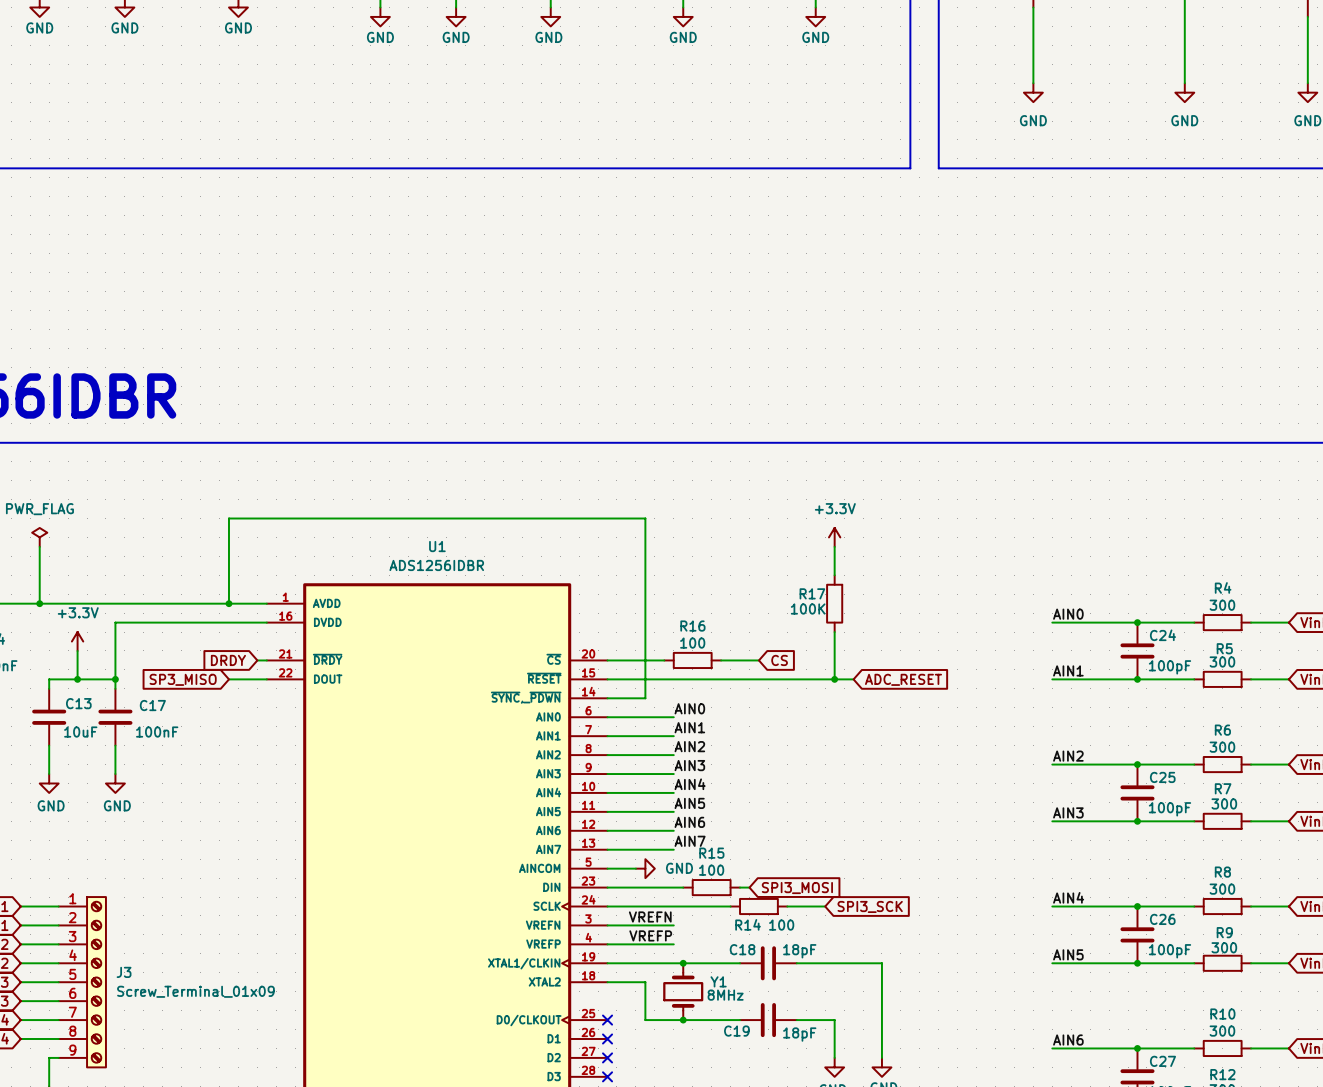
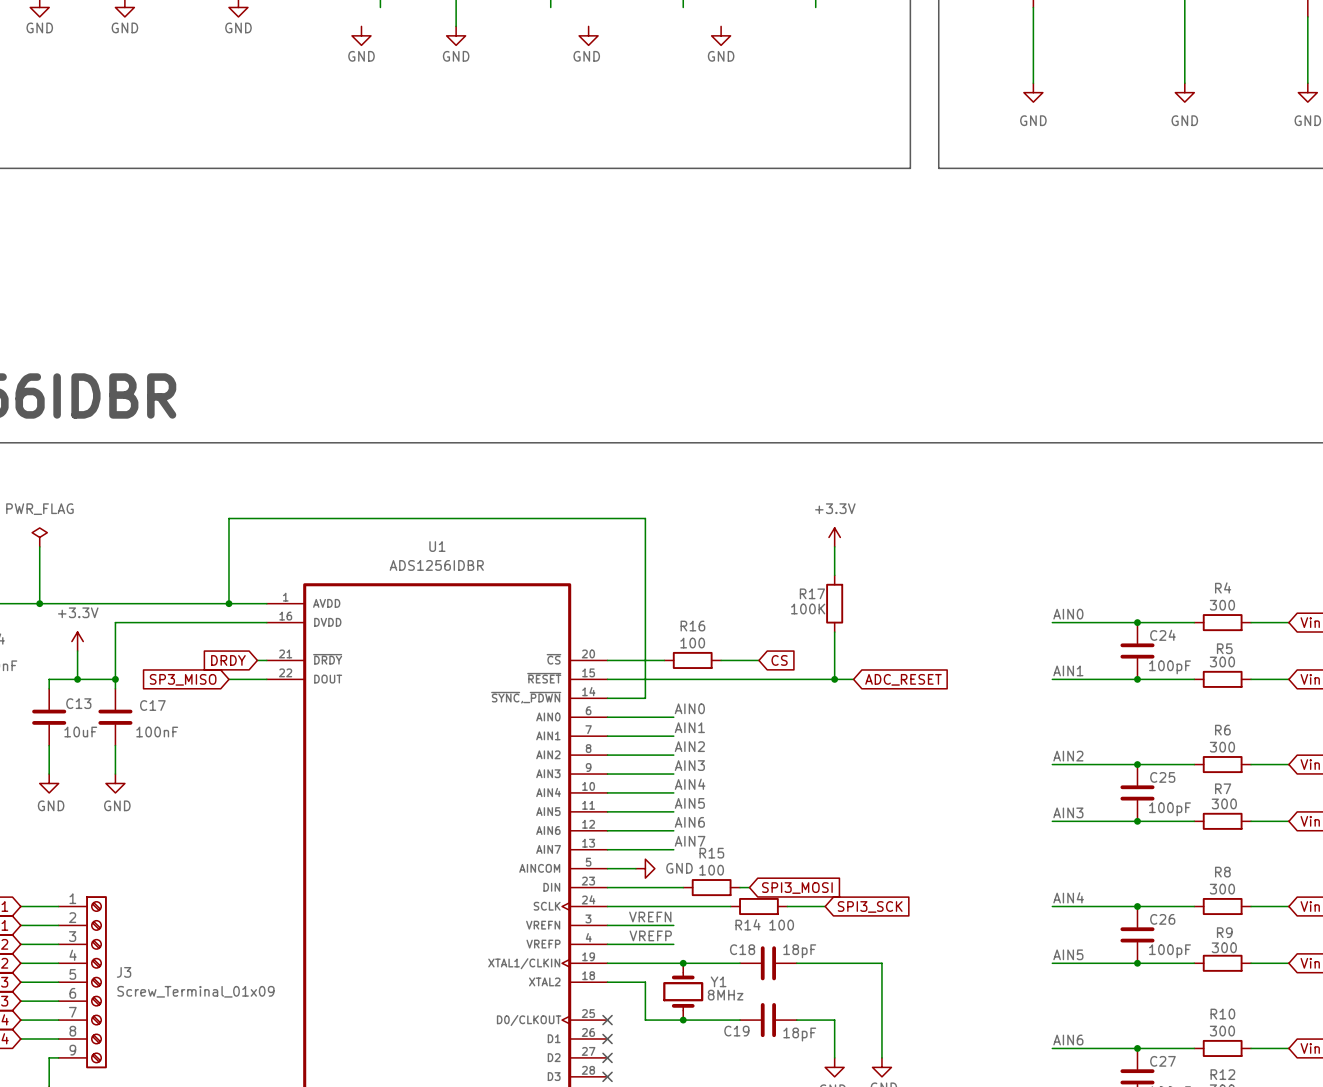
power symbol position: GND (380, 16) -> GND (361, 35)
power symbol position: GND (456, 16) -> GND (456, 35)
power symbol position: GND (550, 16) -> GND (588, 35)
power symbol position: GND (683, 16) -> GND (721, 35)
power symbol: GND (815, 16) -> none

